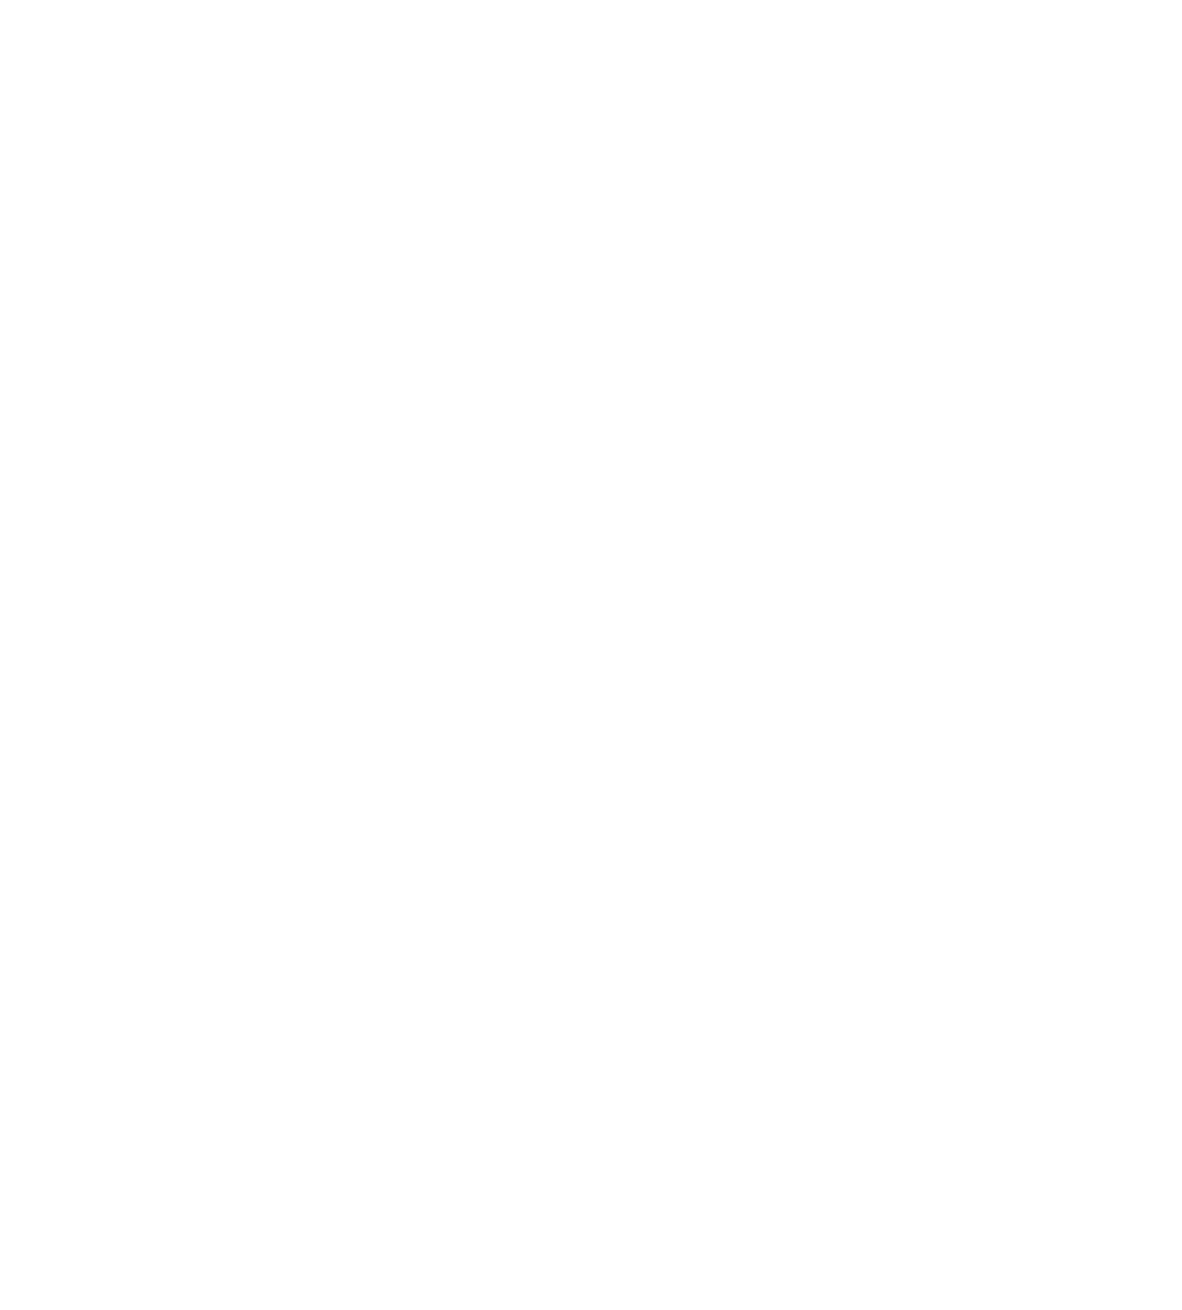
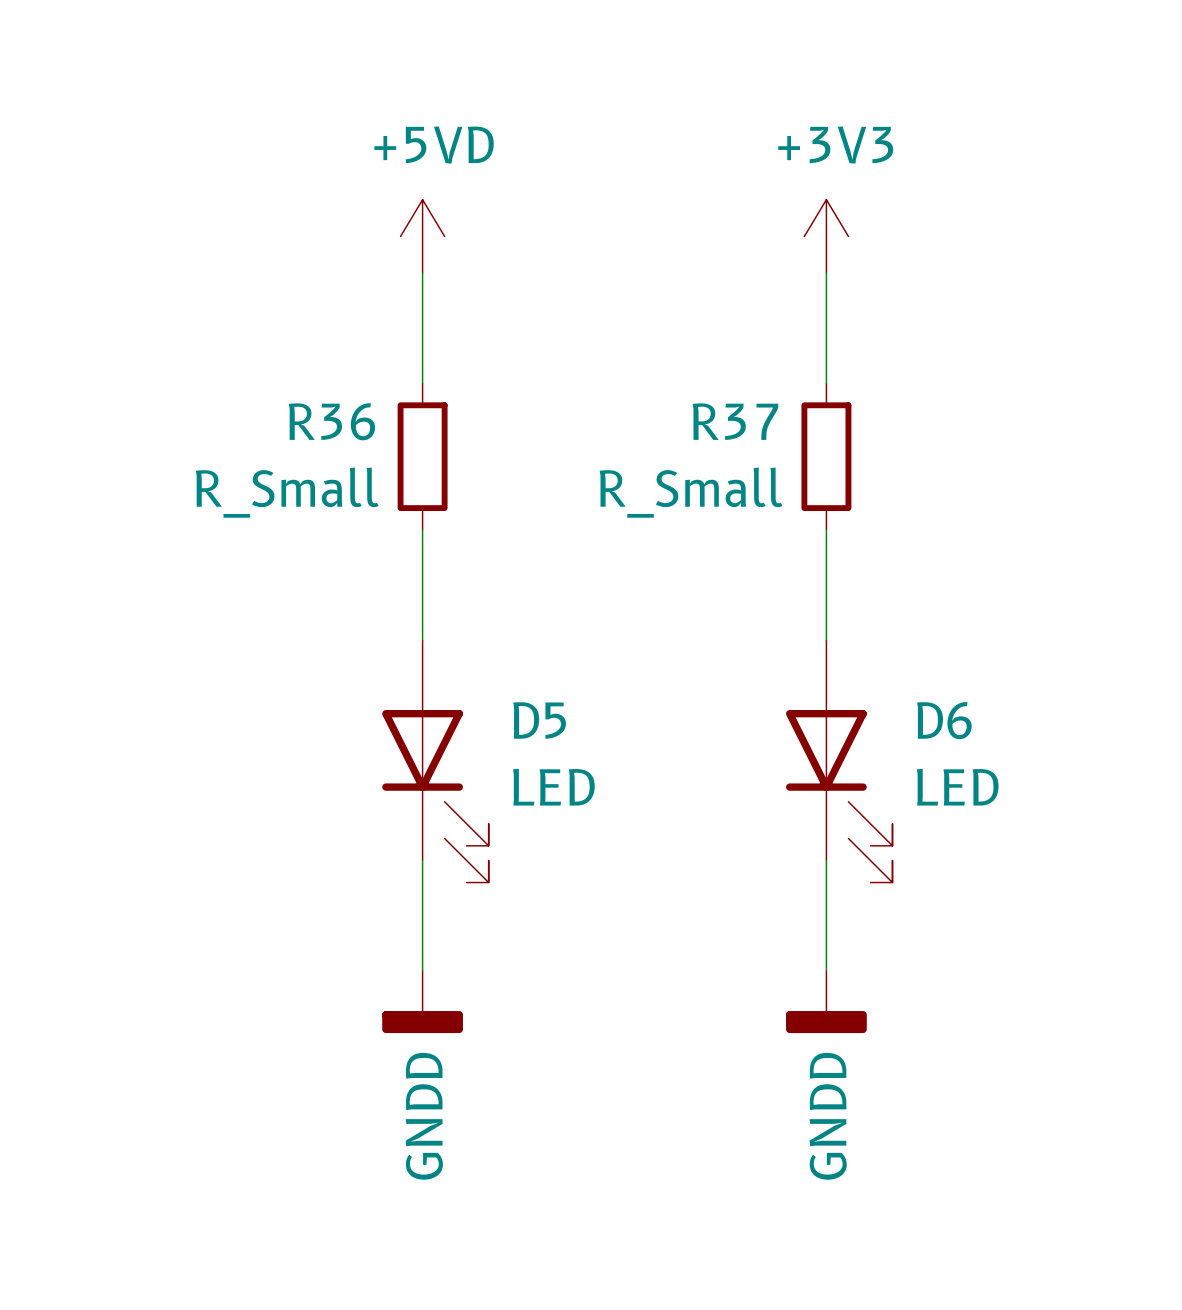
power symbol: none -> +5VD (422, 236)
power symbol: none -> +3V3 (826, 236)
wire: none -> (422, 273) (422, 383)
wire: none -> (826, 273) (826, 383)
R36: none -> R_Small (422, 456)
R37: none -> R_Small (826, 456)
wire: none -> (422, 530) (422, 640)
wire: none -> (826, 530) (826, 640)
D5: none -> LED (435, 761)
D6: none -> LED (839, 761)
wire: none -> (422, 860) (422, 970)
wire: none -> (826, 860) (826, 970)
power symbol: none -> GNDD (422, 1001)
power symbol: none -> GNDD (826, 1001)

